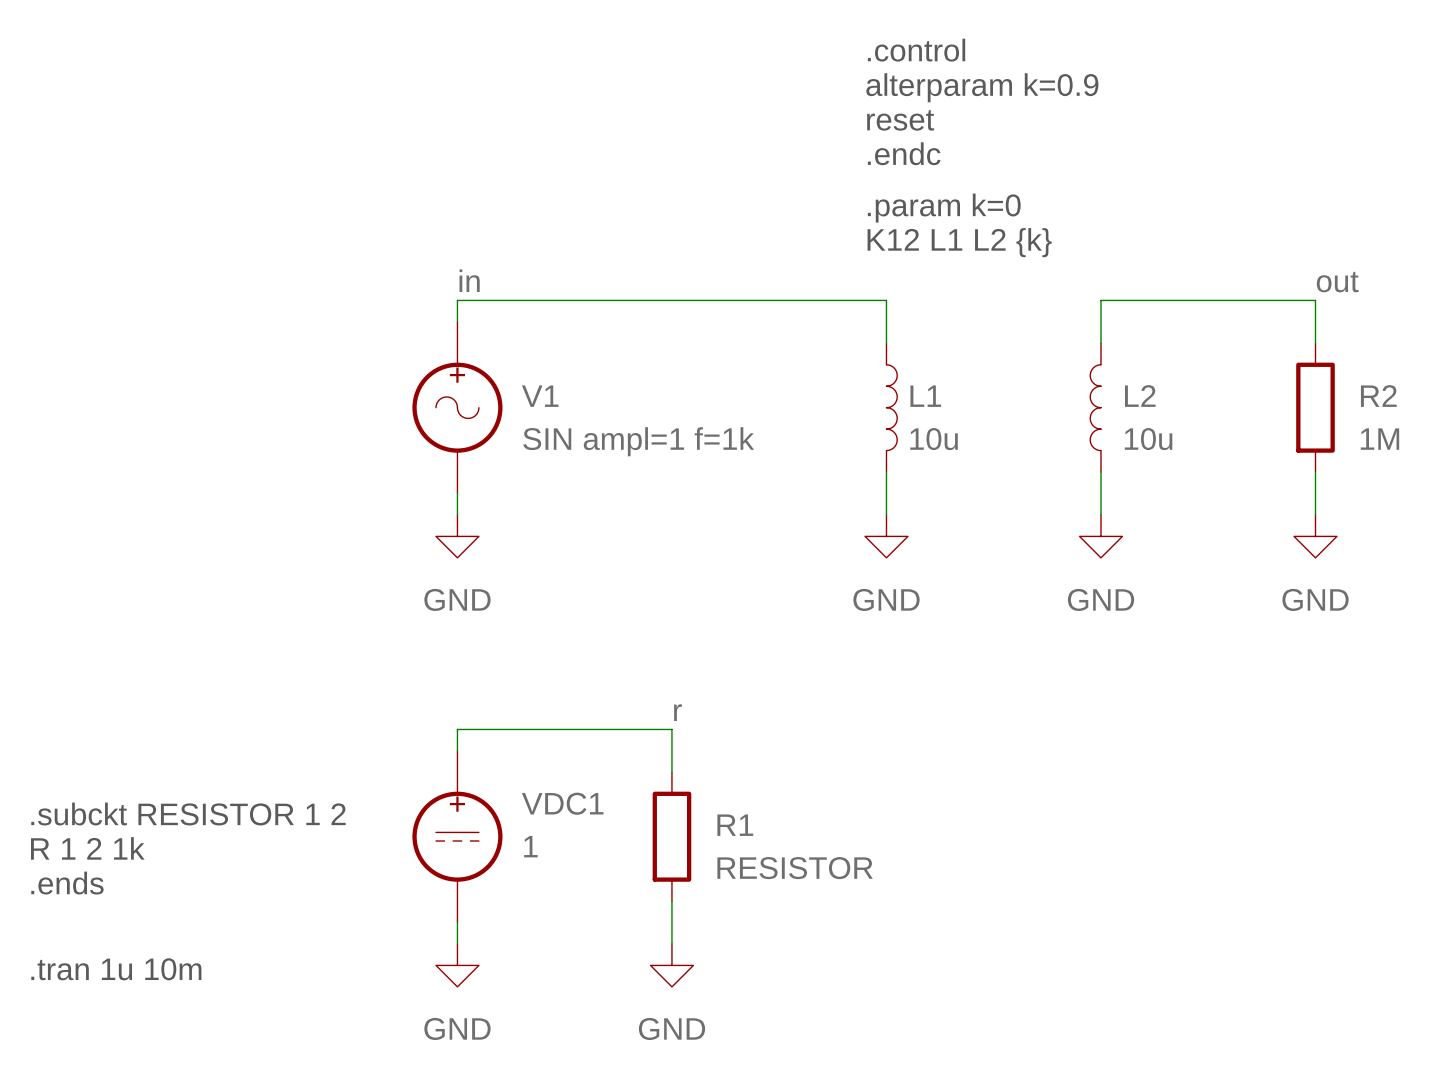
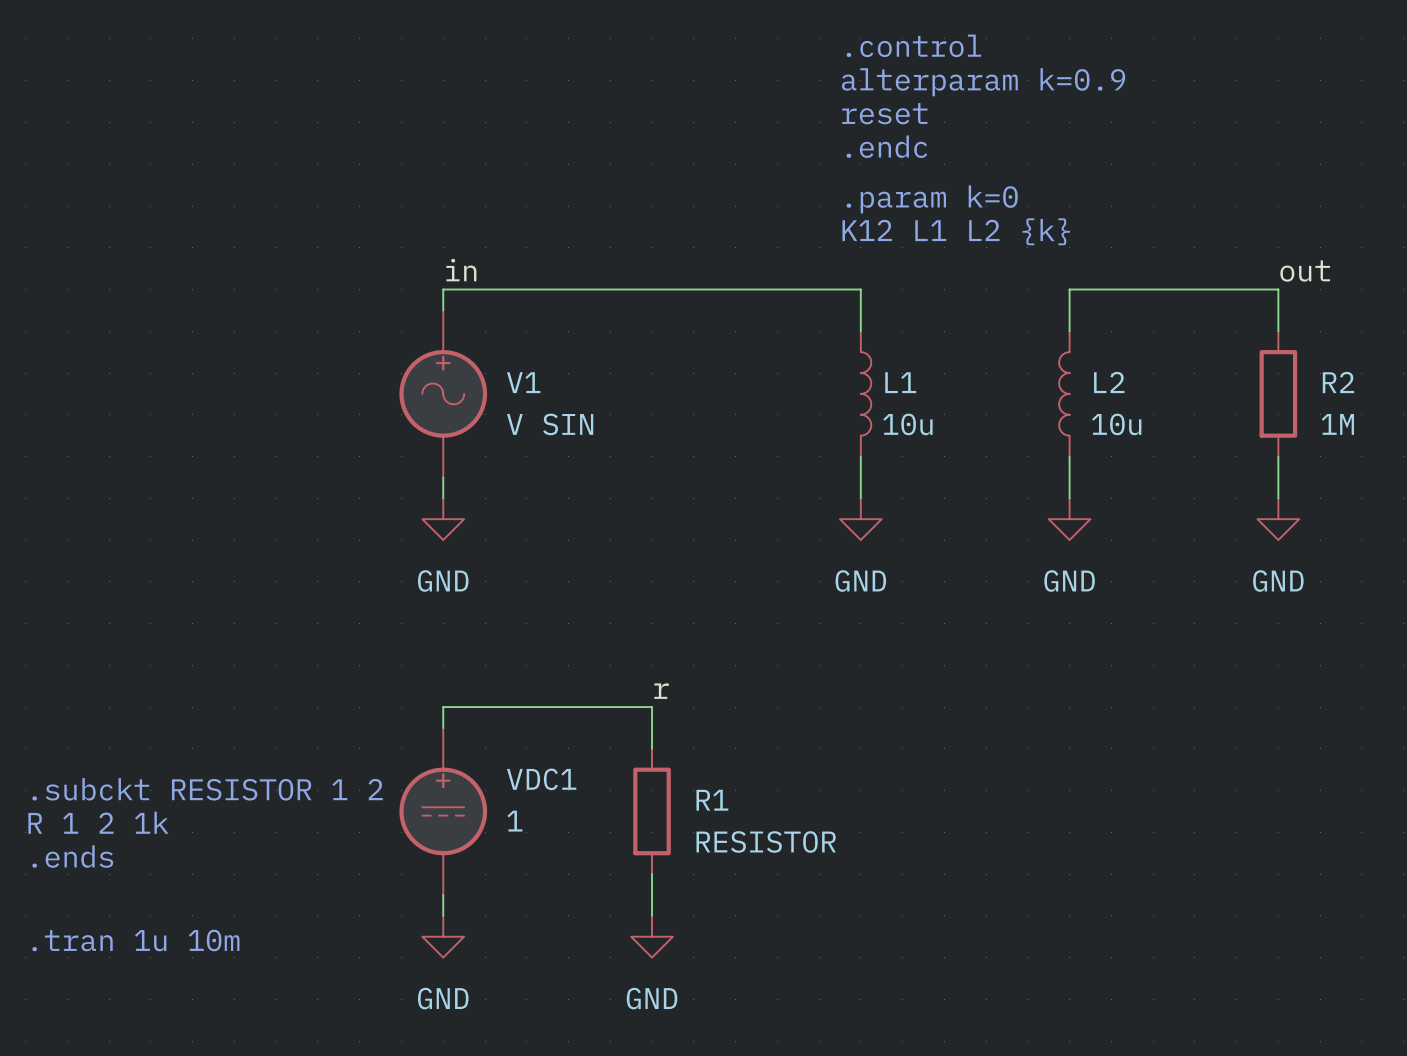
V1 value: SIN ampl=1 f=1k (638, 441) -> V SIN (550, 424)

